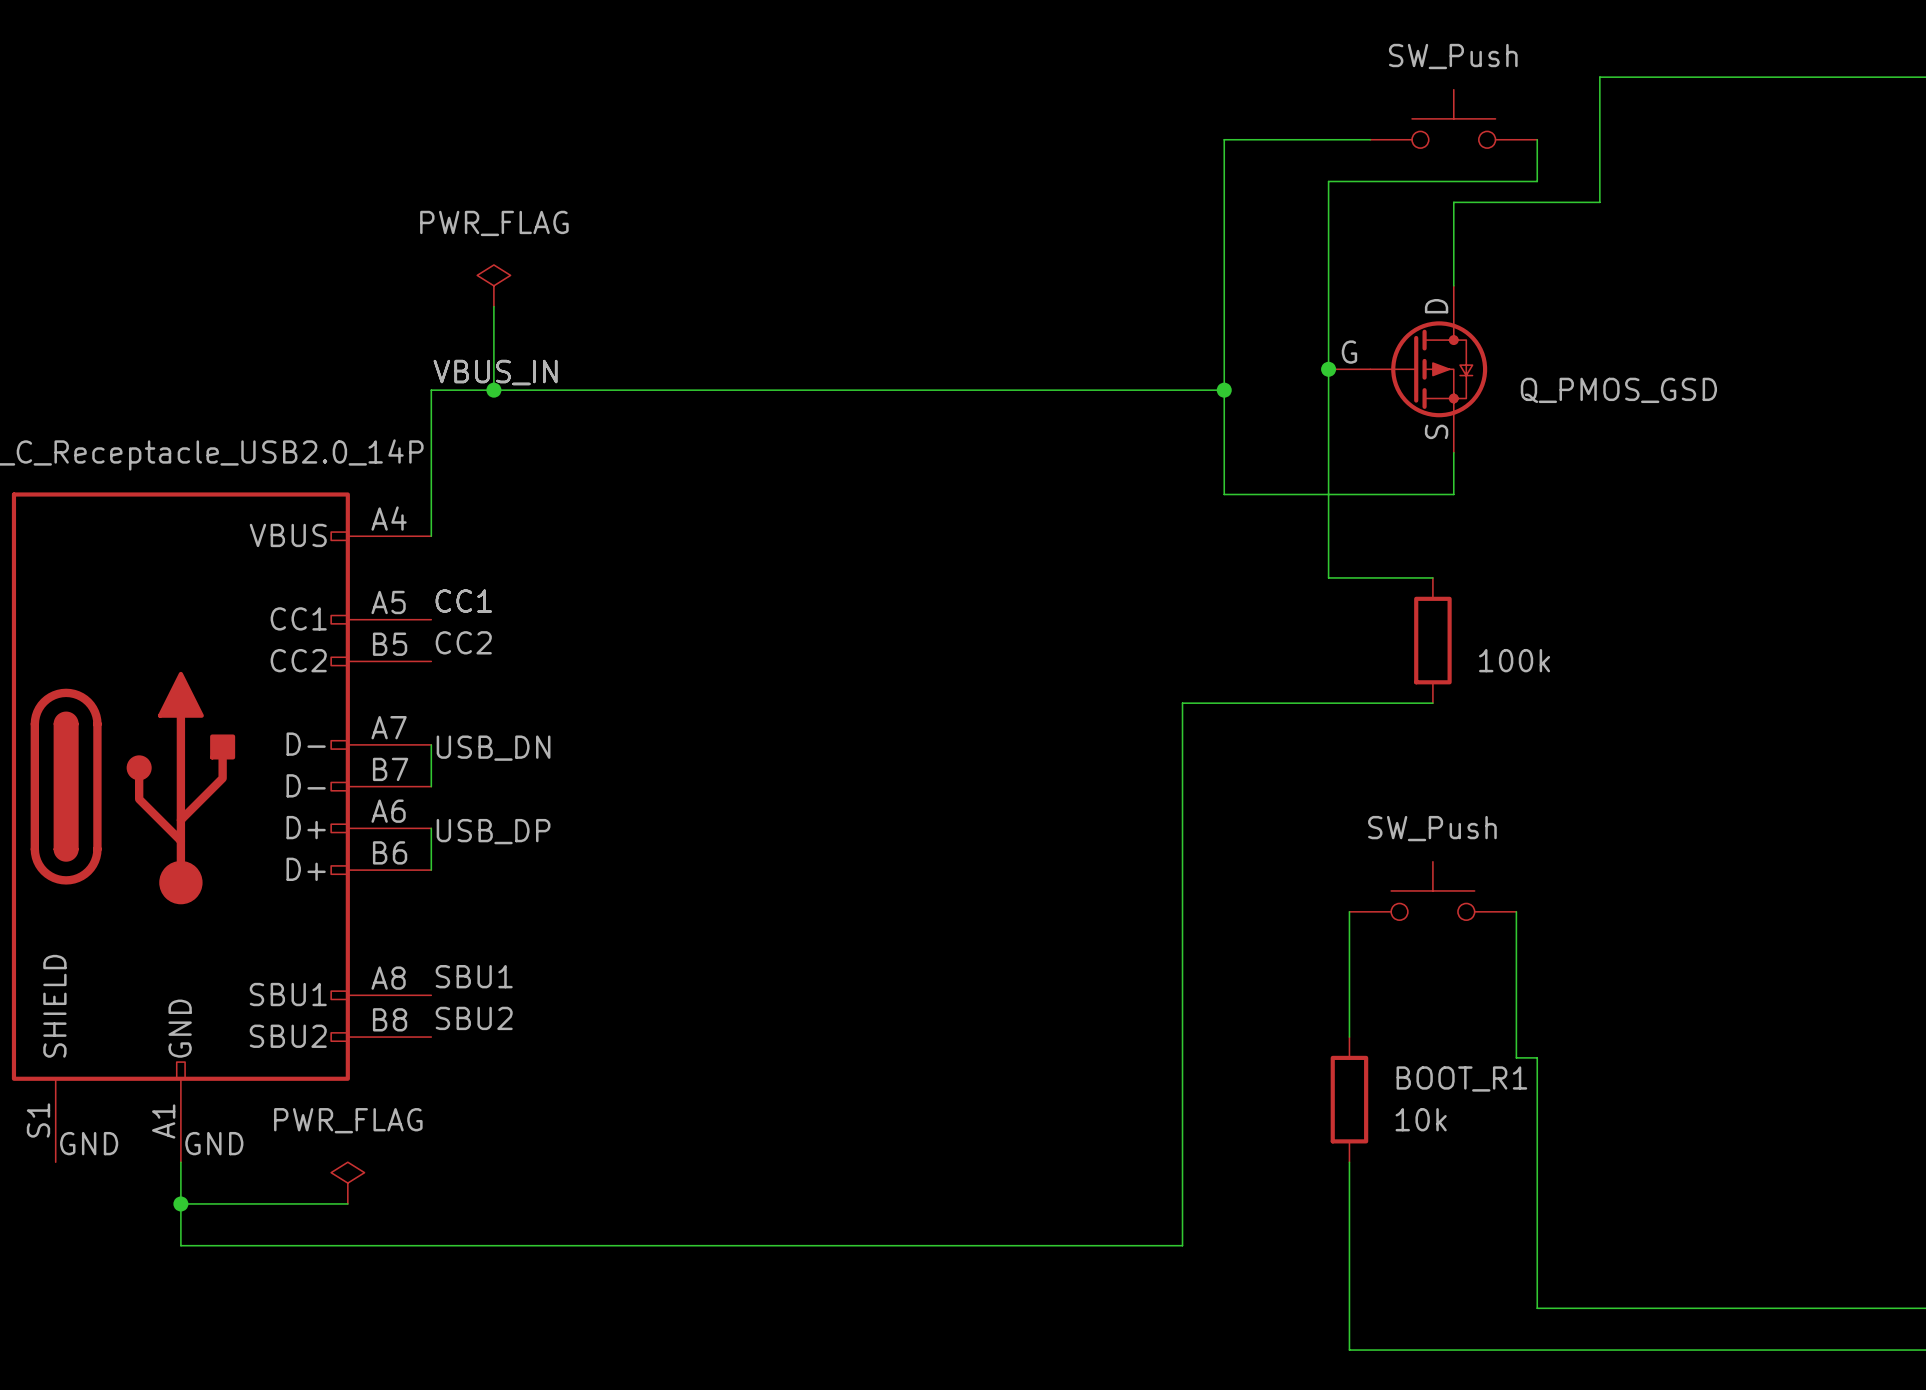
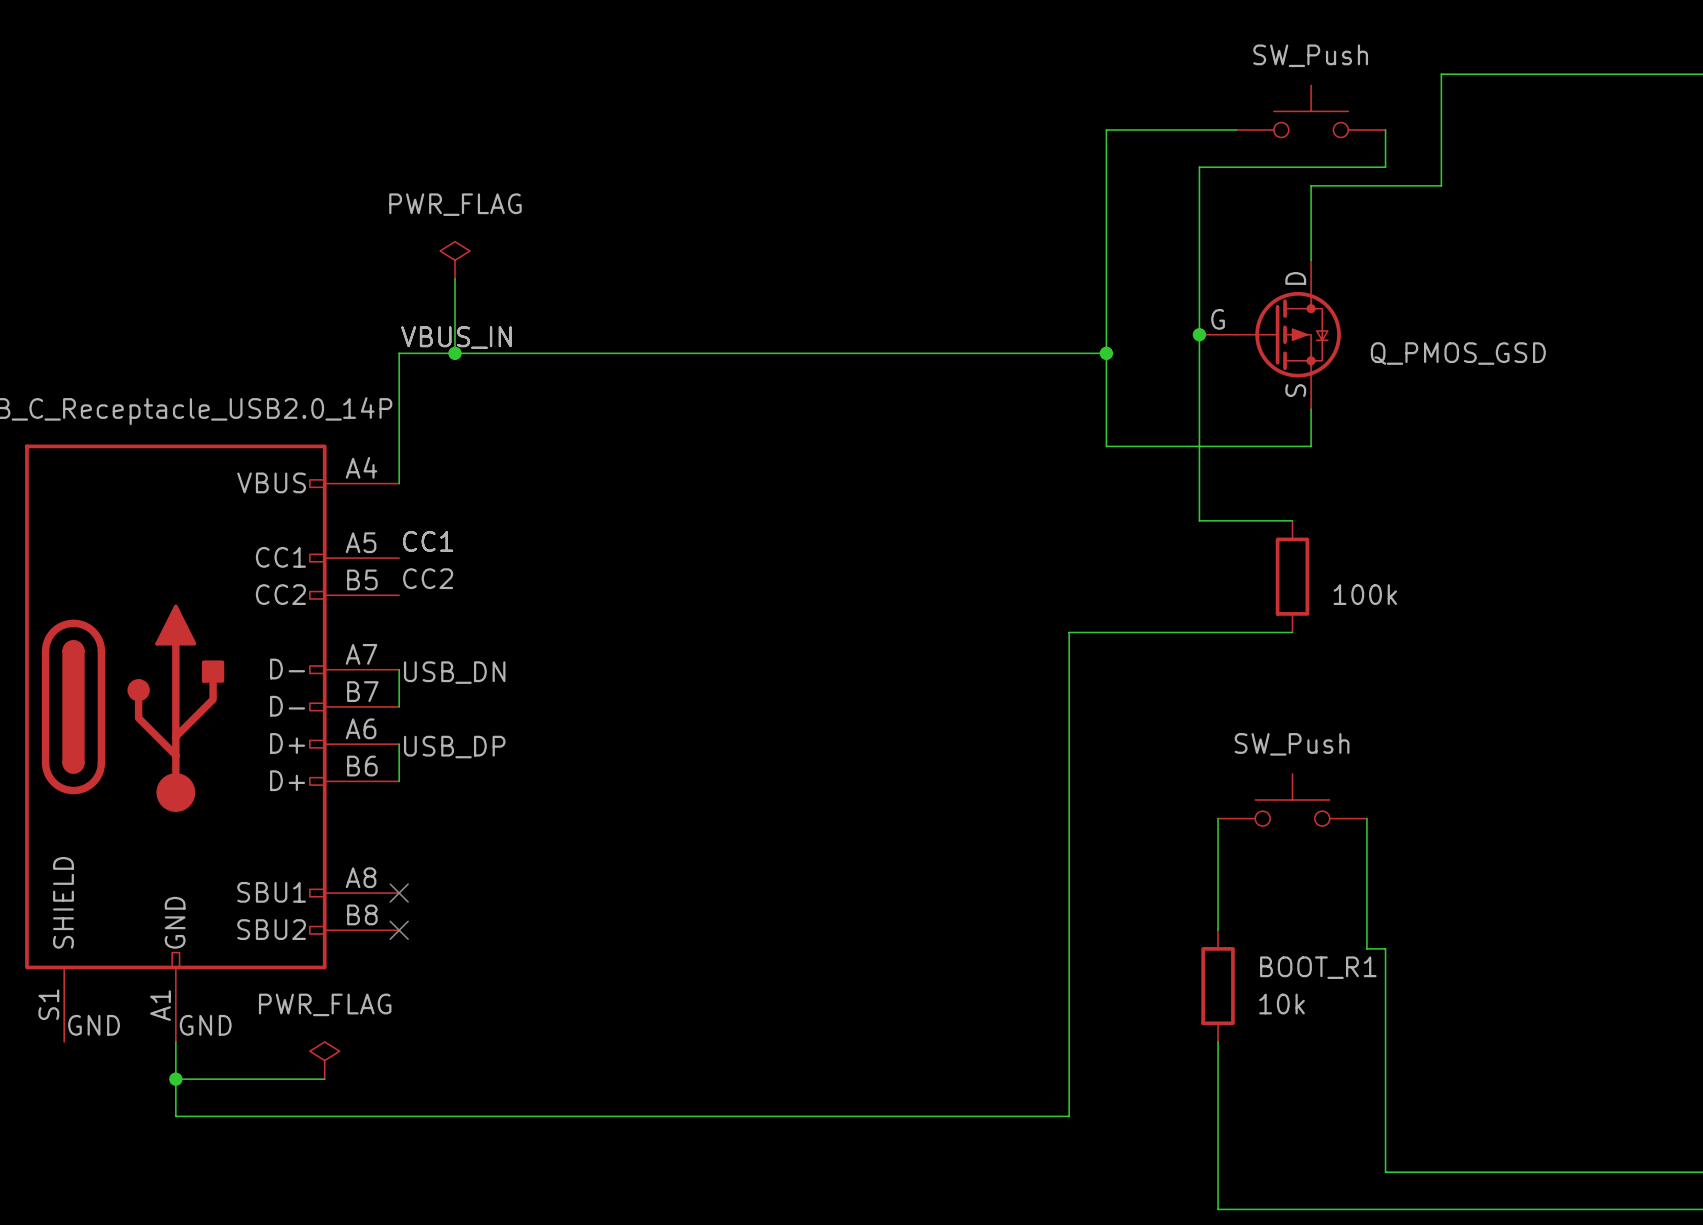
label: SBU1 (474, 976) -> none
no-connect mark: none -> (399, 893)
label: SBU2 (474, 1018) -> none
no-connect mark: none -> (399, 930)

